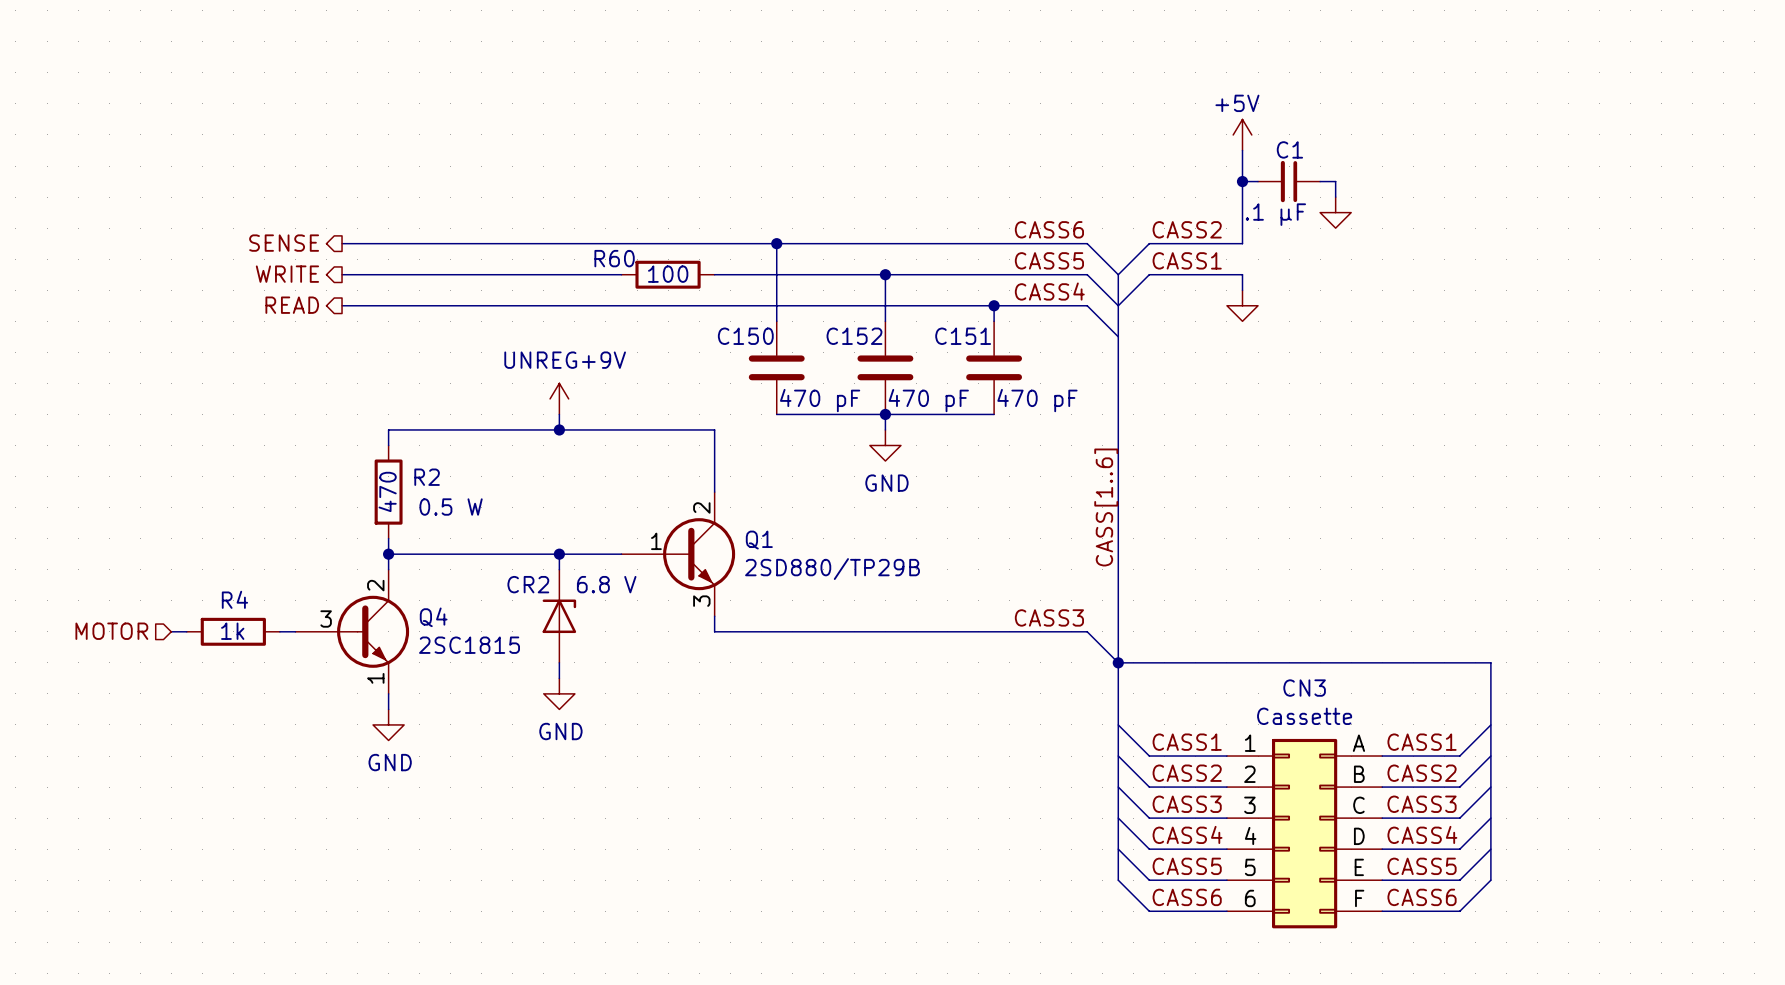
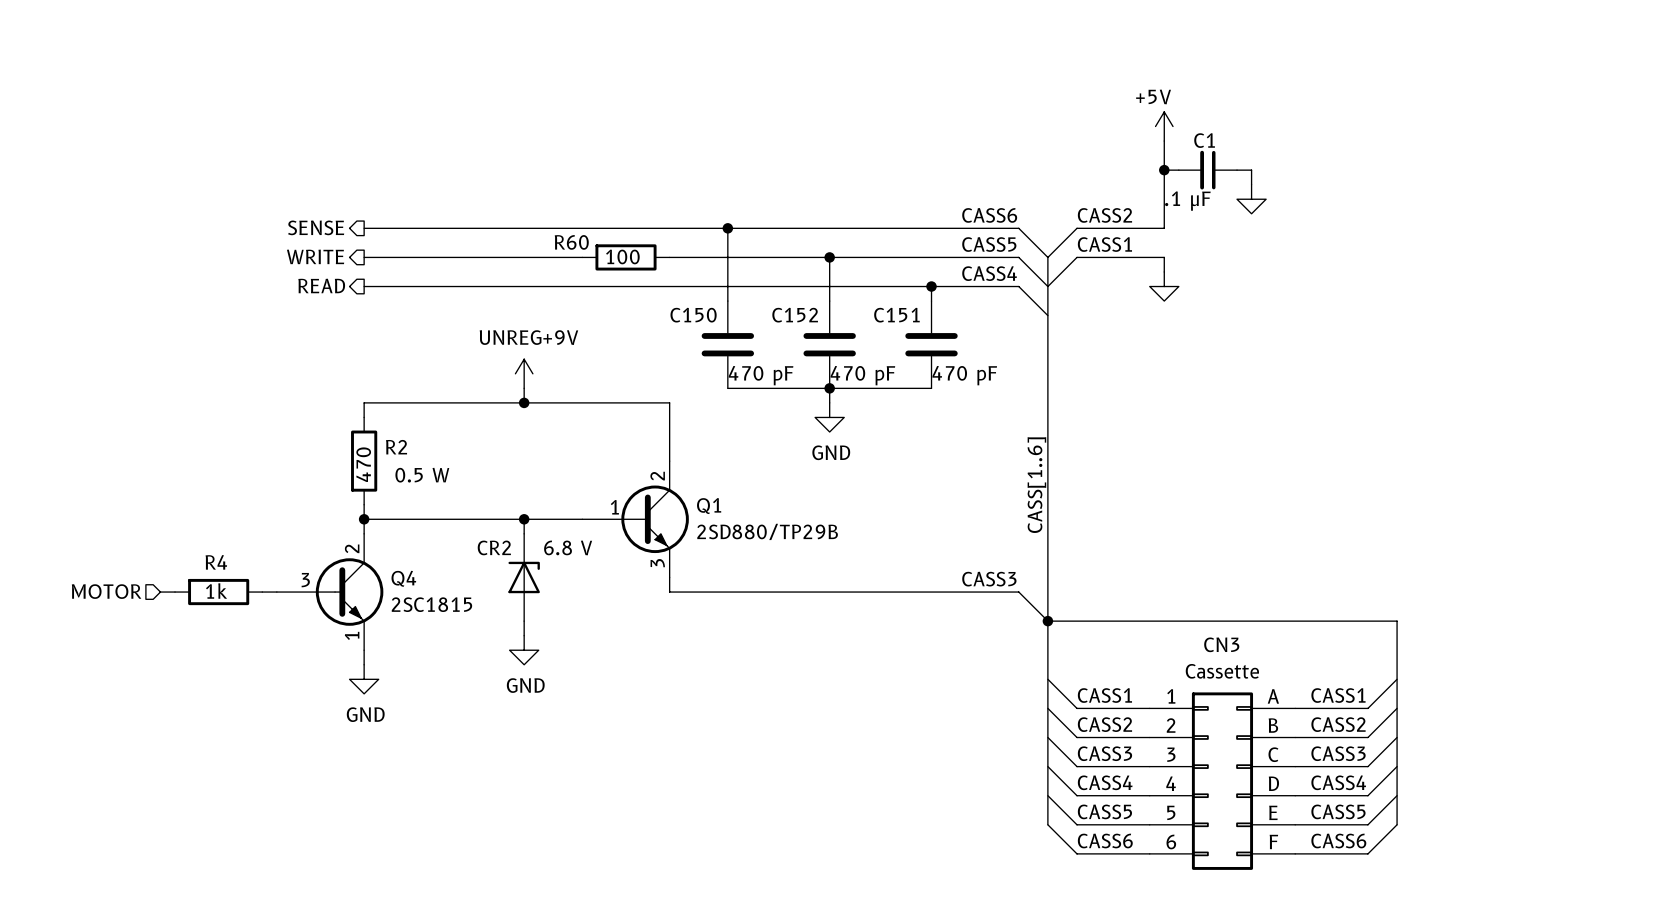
hierarchical label position: SENSE (284, 243) -> SENSE (316, 227)
wire: (342, 243) (388, 243) -> none
hierarchical label position: WRITE (287, 274) -> WRITE (315, 256)
wire: (342, 274) (388, 274) -> none
hierarchical label position: READ (292, 305) -> READ (321, 285)
wire: (342, 305) (388, 305) -> none

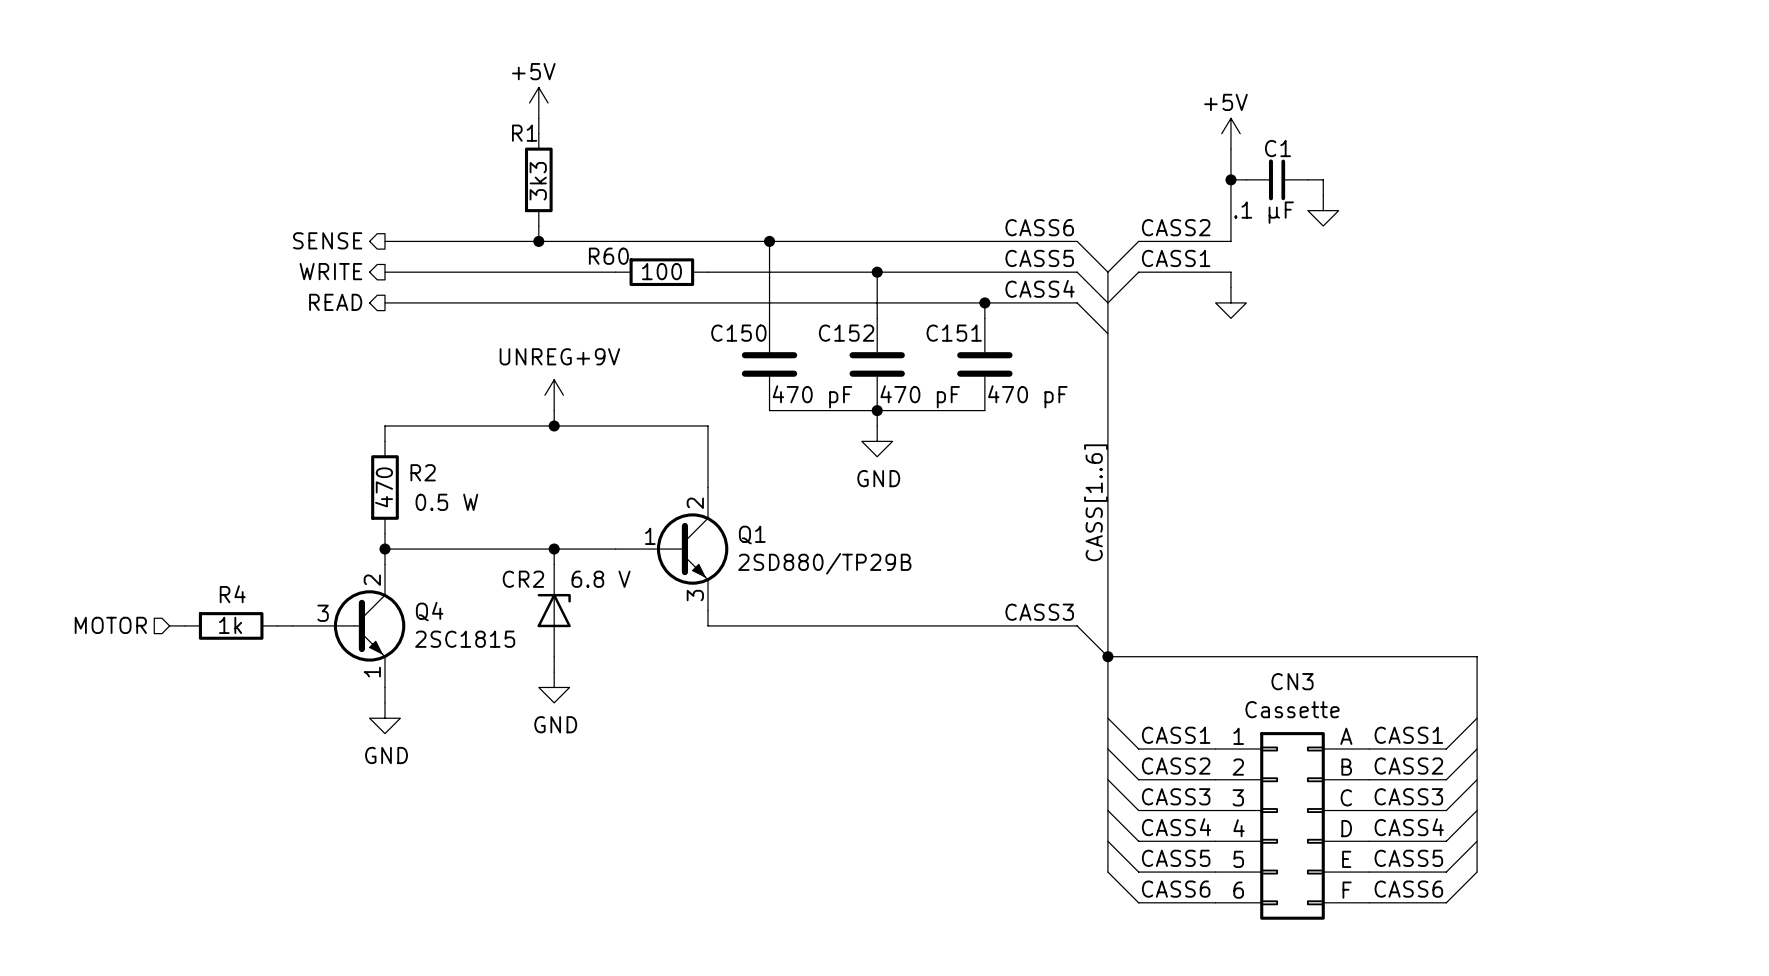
power symbol: none -> +5V (538, 102)
wire: none -> (538, 118) (538, 133)
R1: none -> 3k3 (538, 179)
wire: none -> (538, 226) (538, 241)
junction: none -> (538, 241)

